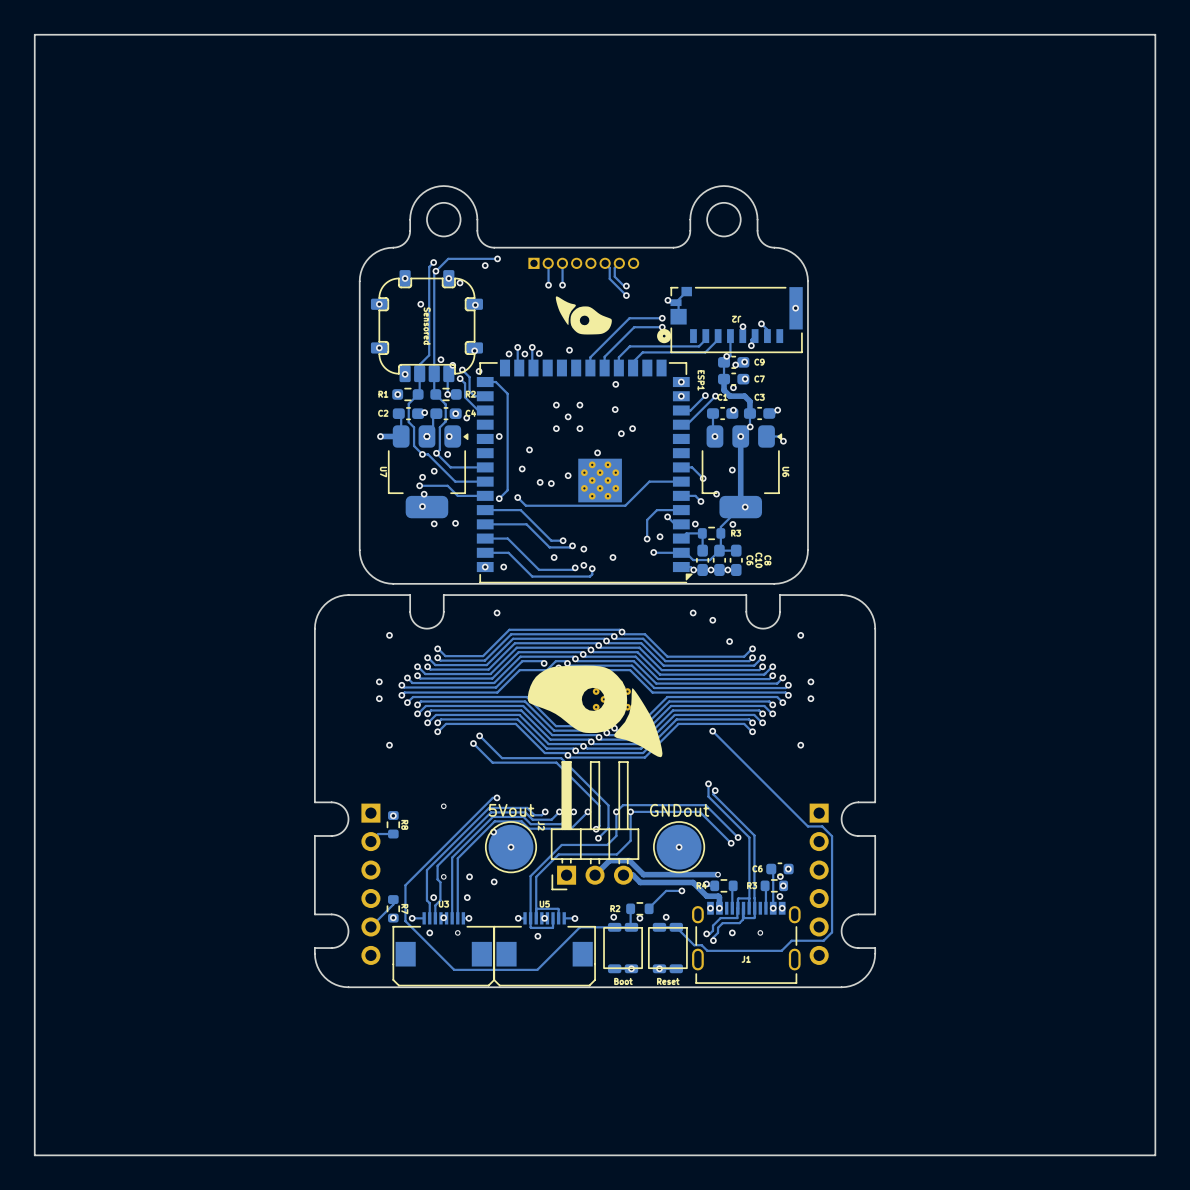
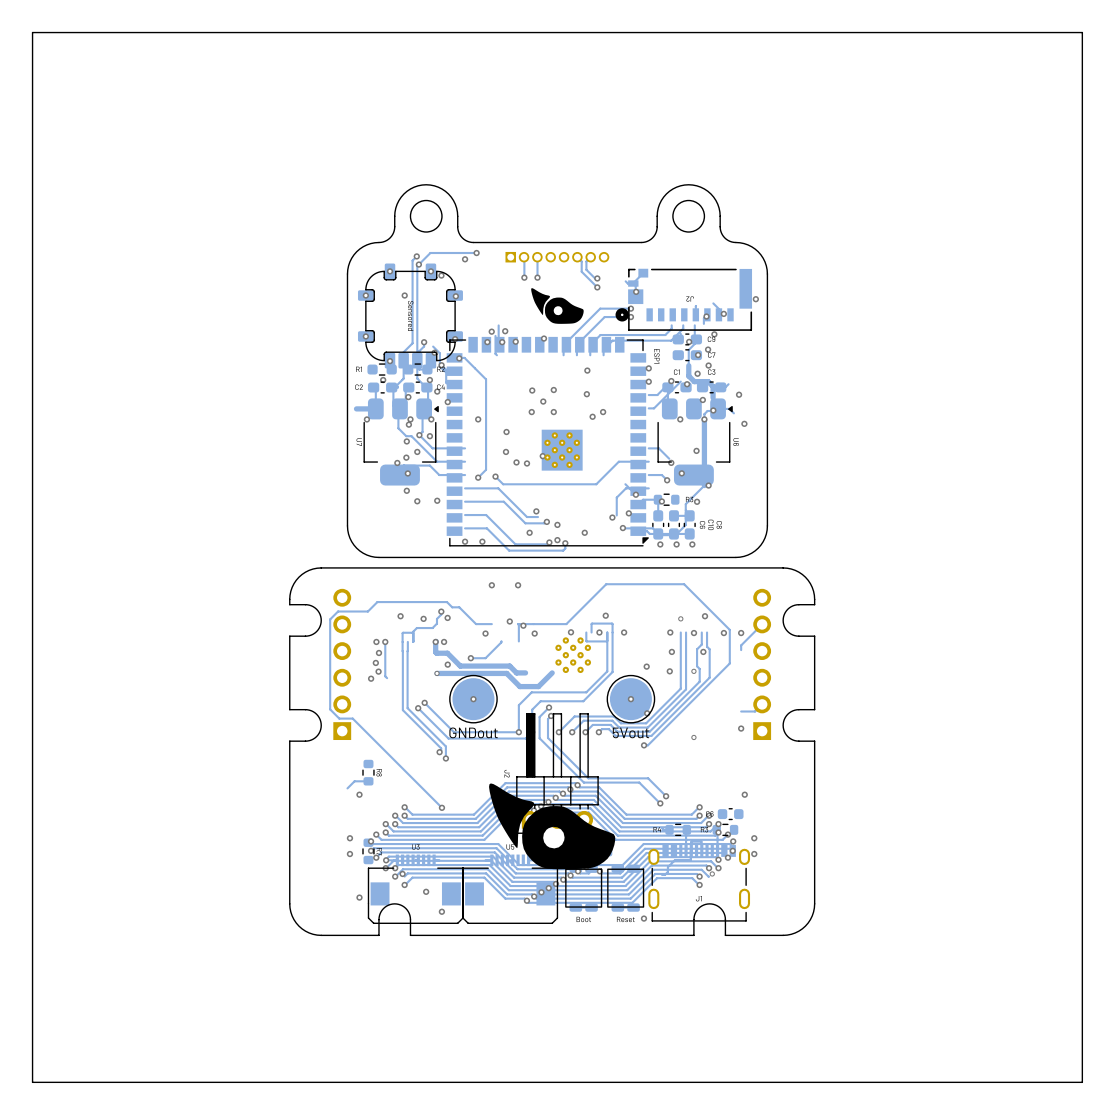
round board edge position: (443, 219) -> (426, 216)
round board edge position: (723, 219) -> (688, 216)
board edge: (757, 219) (757, 233) (761, 241) (767, 246) (783, 248) (794, 254) (803, 264) (807, 276) (807, 550) (805, 563) (798, 573) (787, 581) (774, 583) (393, 583) (380, 581) (369, 573) (362, 563) (359, 550) (360, 276) (364, 264) (372, 254) (384, 248) (399, 246) (406, 241) (410, 233) (411, 210) (419, 195) (430, 188) (443, 186) (452, 187) (464, 192) (472, 202) (476, 210) (479, 239) (483, 244) (492, 247) (677, 247) (685, 242) (689, 237) (691, 210) (697, 199) (707, 190) (719, 186) (732, 187) (747, 195) (754, 206) (757, 219) -> none
track: (497, 258) (448, 258) (434, 272) (434, 392) (445, 404) -> (476, 253) (430, 253) (417, 266) (417, 378)
via: (497, 258) -> none
track: (433, 262) (429, 266) (429, 355) (419, 364) (419, 392) (408, 403) (408, 422) (414, 427) (414, 446) (422, 454) (428, 454) (439, 465) -> (416, 256) (412, 260) (412, 343) (403, 352) (403, 378) (393, 388) (393, 405) (398, 410) (398, 428) (406, 436) (411, 436)
via: (433, 262) -> none
track: (548, 263) (548, 285) -> (524, 257) (524, 277)
track: (562, 263) (562, 285) -> (537, 257) (537, 277)
part position: (583, 263) -> (557, 257)
track: (605, 263) (609, 267) (609, 278) (620, 290) -> (577, 257) (581, 261) (581, 271)
track: (619, 263) (614, 267) (614, 276) (626, 286) -> (590, 257) (586, 261) (586, 269) (597, 278)
via: (485, 265) -> none
via: none -> (476, 253)
via: (435, 271) -> none
via: none -> (416, 256)
via: none -> (465, 259)
via: (405, 278) -> none
via: (448, 278) -> none
via: none -> (418, 264)
via: (460, 282) -> none
via: (548, 285) -> none
via: (562, 285) -> none
via: (626, 286) -> none
via: none -> (390, 271)
via: none -> (430, 271)
via: none -> (441, 275)
track: none -> (586, 276) (597, 287)
via: (626, 295) -> none
via: none -> (524, 277)
via: none -> (537, 277)
via: none -> (597, 278)
via: (667, 300) -> none
via position: (379, 304) -> (365, 295)
via: (420, 304) -> none
via: (475, 305) -> none
via: none -> (597, 287)
via position: (795, 308) -> (755, 299)
via: none -> (636, 291)
via: none -> (404, 295)
drawing position: (583, 315) -> (557, 306)
via: none -> (455, 296)
track: (662, 318) (629, 318) (590, 357) (590, 368) -> (630, 308) (600, 308) (563, 345) (563, 355)
via: (662, 318) -> none
via: (761, 323) -> none
part position: (426, 326) -> (410, 315)
via: (742, 326) -> none
track: (662, 327) (634, 327) (604, 356) (604, 368) -> (630, 317) (604, 317) (576, 344) (576, 355)
via: (662, 327) -> none
via: none -> (630, 308)
via: none -> (723, 313)
track: (705, 336) (705, 339) (699, 346) (629, 346) (618, 357) (618, 368) -> (671, 325) (671, 328) (665, 335) (600, 335) (590, 345) (590, 355)
track: (718, 336) (718, 339) (705, 352) (642, 352) (633, 362) (633, 368) -> (683, 325) (683, 328) (671, 340) (612, 340) (603, 349) (603, 355)
track: (730, 336) (730, 355) (724, 362) (724, 390) (729, 396) (744, 396) (749, 401) (749, 413) -> (694, 325) (694, 343) (688, 349) (688, 376) (694, 381) (708, 381) (713, 386) (713, 397)
via: none -> (706, 316)
via: none -> (630, 317)
via: (751, 345) -> none
via: (379, 347) -> none
track: (517, 347) (519, 368) -> (495, 335) (496, 355)
via: (517, 347) -> none
via: (532, 347) -> none
via: (474, 350) -> none
via: (569, 350) -> none
via: (509, 354) -> none
via: (726, 356) -> none
via: none -> (714, 334)
via: none -> (365, 336)
via: (440, 359) -> none
via: none -> (544, 338)
via: (744, 361) -> none
via: none -> (455, 339)
via: none -> (515, 341)
via: none -> (487, 342)
via: none -> (502, 342)
via: (462, 369) -> none
via: (479, 371) -> none
via: none -> (708, 349)
via: (405, 374) -> none
via: none -> (434, 352)
track: (460, 378) (465, 383) (465, 397) (476, 408) -> (441, 365) (446, 369) (446, 382)
via: (460, 378) -> none
via: none -> (459, 358)
via: (681, 382) -> none
via: (615, 384) -> none
via: none -> (390, 361)
via: (733, 387) -> none
via: none -> (441, 365)
via: none -> (708, 365)
track: (507, 393) (507, 490) (499, 498) -> (475, 368) (486, 379) (486, 469) (478, 477)
via: none -> (648, 368)
via: (397, 394) -> none
via: (447, 394) -> none
via: none -> (587, 370)
track: (705, 395) (690, 410) (681, 410) -> (671, 381) (657, 395) (648, 395)
via: (705, 395) -> none
via: (681, 396) -> none
track: (715, 396) (686, 424) (681, 424) -> (680, 381) (654, 408) (648, 408)
via: (715, 396) -> none
via: none -> (697, 373)
track: (445, 404) (445, 421) (439, 427) (439, 449) (436, 453) (447, 464) -> (417, 378) (428, 389) (428, 405) (422, 410) (422, 432) (419, 435)
via: none -> (383, 380)
via: none -> (429, 380)
via: (556, 405) -> none
via: (579, 405) -> none
via: none -> (671, 381)
via: none -> (648, 381)
via: (615, 409) -> none
via: (777, 410) -> none
via: (424, 412) -> none
via: (455, 413) -> none
track: (749, 413) (750, 426) (744, 427) (740, 430) (740, 507) -> (713, 397) (713, 410) (707, 411) (704, 414) (704, 485)
via: none -> (553, 390)
via: none -> (586, 394)
via: none -> (739, 394)
via: none -> (408, 397)
via position: (556, 428) -> (531, 412)
via: (632, 428) -> none
via: none -> (447, 402)
via: (621, 433) -> none
via: (380, 436) -> none
via: (426, 436) -> none
via: (449, 436) -> none
via: (499, 436) -> none
via: (714, 436) -> none
via: (740, 436) -> none
via: none -> (713, 410)
via: none -> (603, 412)
via: (783, 441) -> none
via: none -> (592, 416)
via: none -> (366, 419)
via: none -> (410, 419)
via: none -> (431, 419)
via: none -> (478, 419)
via: none -> (680, 419)
via: none -> (704, 419)
via: (529, 449) -> none
via position: (597, 452) -> (553, 412)
via: none -> (744, 423)
via: (422, 454) -> none
via: (447, 454) -> none
via: none -> (506, 432)
via: none -> (419, 435)
via: none -> (429, 436)
track: (485, 467) (450, 467) -> (465, 448) (432, 448) (422, 437)
track: (681, 467) (692, 467) (703, 478) -> (648, 448) (658, 448) (669, 458)
via: (522, 468) -> none
via: (732, 470) -> none
via: (568, 475) -> none
via: (422, 477) -> none
via: (703, 478) -> none
track: (485, 481) (455, 481) -> (465, 461) (437, 461) (426, 451)
track: (681, 481) (649, 481) (625, 505) (525, 505) (517, 497) -> (648, 461) (618, 461) (596, 484) (503, 484) (495, 476)
via: none -> (696, 450)
via: none -> (417, 451)
via: (551, 483) -> none
via: (419, 485) -> none
track: (420, 485) (447, 485) (457, 495) (485, 495) -> (404, 465) (429, 465) (439, 475) (465, 475)
via: none -> (542, 456)
via: none -> (406, 457)
via: none -> (516, 462)
via: none -> (527, 463)
track: (681, 495) (695, 495) (700, 501) -> (648, 475) (661, 475) (667, 480)
via: (517, 497) -> none
via: (499, 498) -> none
via: (700, 501) -> none
via: none -> (407, 473)
via: none -> (681, 473)
via: (422, 506) -> none
track: (740, 507) (720, 526) (720, 549) (710, 560) (693, 560) (685, 552) (653, 552) -> (704, 485) (685, 504) (685, 525) (675, 535) (659, 535) (653, 528) (622, 528)
via: (745, 507) -> none
via: none -> (495, 476)
via: none -> (478, 477)
track: (485, 510) (520, 510) (531, 521) -> (465, 488) (498, 488)
track: (681, 510) (657, 510) (647, 519) (647, 539) -> (648, 488) (626, 488) (616, 497) (616, 515)
via: none -> (667, 480)
via: (667, 516) -> none
via: none -> (708, 485)
via: (455, 523) -> none
track: (485, 524) (526, 524) (537, 535) -> (465, 501) (503, 501)
via: (695, 524) -> none
via: (732, 524) -> none
via: none -> (635, 494)
via: none -> (437, 500)
via: none -> (417, 501)
via: none -> (661, 501)
via: none -> (697, 501)
via: (660, 536) -> none
track: (485, 538) (507, 538) (518, 549) -> (465, 515) (486, 515)
via: (647, 539) -> none
track: (563, 540) (551, 540) -> (538, 517) (527, 517) (516, 506)
via: (563, 540) -> none
track: (572, 545) (549, 547) -> (546, 521) (525, 523) (514, 512)
via: none -> (628, 513)
via: (583, 549) -> none
track: (485, 552) (508, 552) (519, 564) -> (465, 528) (486, 528)
via: (554, 557) -> none
via: none -> (546, 521)
via: (612, 557) -> none
via: none -> (557, 524)
via: none -> (622, 528)
via: (583, 565) -> none
via: (485, 567) -> none
via: (503, 567) -> none
track: (575, 567) (573, 569) (539, 569) -> (549, 542) (547, 544) (515, 544) (504, 533)
via: (575, 567) -> none
via: none -> (529, 532)
track: (592, 568) (592, 574) (590, 576) (532, 576) -> (565, 543) (563, 550) (509, 550) (498, 540)
via: (592, 568) -> none
via: none -> (584, 532)
via: (693, 569) -> none
via: (711, 569) -> none
via: (727, 569) -> none
via: none -> (557, 540)
via: none -> (465, 541)
via: none -> (482, 541)
via: none -> (549, 542)
via: none -> (565, 543)
via: none -> (660, 544)
via: none -> (676, 544)
via: none -> (692, 544)
board edge: (443, 595) (443, 614) (441, 620) (435, 626) (426, 628) (418, 626) (412, 620) (410, 614) (410, 595) -> (415, 557) (384, 557)
board edge: (779, 595) (779, 614) (777, 620) (771, 626) (763, 628) (754, 626) (748, 620) (746, 614) (746, 595) -> (730, 557) (699, 557)
board edge: (785, 595) (850, 596) (865, 604) (872, 615) (874, 624) (875, 802) (856, 802) (849, 804) (843, 810) (841, 819) (843, 827) (849, 833) (856, 835) (875, 835) (875, 914) (856, 914) (849, 916) (843, 922) (841, 931) (843, 939) (849, 945) (856, 947) (875, 948) (874, 958) (872, 966) (865, 977) (854, 984) (845, 986) (348, 987) (335, 984) (324, 977) (316, 962) (314, 948) (333, 947) (340, 945) (347, 937) (348, 929) (345, 921) (338, 915) (314, 914) (314, 835) (333, 835) (340, 833) (346, 827) (348, 819) (346, 810) (340, 804) (333, 802) (314, 802) (316, 619) (324, 604) (339, 596) (404, 595) -> (735, 557) (744, 556) (755, 550) (763, 541) (767, 530) (767, 269) (763, 258) (755, 249) (744, 243) (729, 241) (723, 236) (720, 228) (719, 208) (710, 193) (700, 187) (688, 184) (672, 188) (663, 197) (658, 208) (655, 232) (649, 240) (641, 242) (471, 242) (463, 239) (459, 234) (455, 204) (448, 193) (441, 188) (430, 185) (418, 185) (410, 188) (401, 197) (395, 208) (394, 228) (391, 236) (385, 241) (370, 243) (359, 249) (351, 258) (347, 274) (347, 530) (349, 538) (356, 548) (366, 555) (378, 557)
board edge: none -> (783, 567) (321, 567) (309, 570) (302, 574) (292, 587) (289, 604) (313, 606) (320, 614) (321, 622) (317, 630) (311, 634) (289, 636) (289, 709) (313, 711) (319, 717) (321, 725) (319, 733) (313, 739) (289, 741) (289, 903) (292, 915) (296, 923) (305, 931) (317, 935) (378, 935) (381, 911) (386, 905) (394, 903) (402, 905) (408, 911) (410, 935) (693, 935) (696, 911) (701, 905) (709, 903) (717, 905) (723, 911) (725, 935) (787, 935) (802, 928) (810, 919) (814, 907) (814, 741) (791, 739) (785, 733) (783, 725) (785, 717) (791, 711) (814, 709) (814, 636) (791, 634) (785, 628) (783, 620) (785, 612) (791, 606) (814, 604) (814, 599) (812, 587) (805, 577) (795, 570) (783, 567)
via: (497, 612) -> none
via: (693, 612) -> none
via: (712, 620) -> none
via: none -> (491, 585)
via: none -> (518, 585)
via: (622, 632) -> none
via: (389, 635) -> none
via: (800, 635) -> none
via: (614, 636) -> none
via: (606, 640) -> none
via: (729, 641) -> none
via: (598, 645) -> none
via: (437, 648) -> none
track: (752, 648) (744, 656) (667, 656) (644, 634) (624, 634) (619, 629) (509, 629) (483, 656) (445, 656) (437, 648) -> none
via: (752, 648) -> none
via: (590, 649) -> none
track: none -> (441, 611) (441, 614) (436, 618) (436, 623) (432, 628) (416, 628) (413, 631) (413, 641) (412, 632) (402, 633) (402, 710) (441, 748) (439, 752)
via: none -> (441, 611)
via: (583, 654) -> none
via: (437, 657) -> none
via: none -> (605, 615)
track: (752, 657) (749, 661) (665, 661) (643, 638) (616, 638) (611, 634) (511, 634) (484, 660) (440, 660) (437, 657) -> none
track: (762, 657) (754, 665) (663, 665) (641, 643) (608, 643) (604, 638) (513, 638) (486, 665) (435, 665) (427, 657) -> none
via: (762, 657) -> none
via: (575, 658) -> none
via: none -> (447, 617)
via: none -> (423, 618)
via: none -> (680, 618)
track: (544, 663) (541, 661) (522, 661) (496, 687) (404, 687) (401, 685) -> none
via: (567, 663) -> none
drawing: [527, 665, 663, 758] -> none
via: (417, 666) -> none
via: (427, 666) -> none
track: none -> (491, 624) (476, 624) (459, 607) (452, 607) (446, 602) (377, 602) (367, 611) (338, 611) (330, 619) (330, 709) (339, 718) (352, 718) (441, 807)
track: (762, 666) (759, 670) (661, 670) (639, 647) (600, 647) (596, 643) (514, 643) (488, 669) (430, 669) (427, 666) -> none
via: (762, 666) -> none
track: (772, 666) (764, 674) (659, 674) (637, 652) (593, 652) (588, 647) (516, 647) (490, 674) (425, 674) (417, 666) -> none
via: (772, 666) -> none
track: none -> (762, 624) (741, 645) (741, 650)
track: (558, 667) (560, 670) (630, 670) (652, 692) (785, 692) (788, 695) -> none
via: none -> (571, 632)
via: (417, 675) -> none
track: none -> (586, 632) (586, 641) (607, 640)
via: none -> (599, 632)
track: none -> (607, 632) (607, 671) (586, 692) (531, 692) (518, 705) (518, 732) (454, 732) (424, 702)
via: none -> (624, 632)
via: none -> (670, 632)
track: none -> (680, 632) (680, 688) (646, 723) (620, 723) (614, 716) (574, 716) (558, 732)
track: none -> (686, 632) (686, 689) (647, 727) (619, 727) (612, 720) (583, 720) (572, 732)
via: none -> (693, 633)
track: none -> (701, 632) (701, 644) (697, 649) (699, 681) (649, 731) (617, 731) (610, 724) (592, 724) (585, 732)
track: none -> (707, 632) (707, 646) (709, 649) (709, 677) (651, 735) (615, 735) (608, 729) (601, 729) (598, 732)
track: (772, 675) (769, 679) (658, 679) (635, 656) (585, 656) (580, 652) (518, 652) (492, 678) (420, 678) (417, 675) -> none
via: none -> (741, 633)
via: none -> (485, 633)
via: none -> (534, 633)
via: (407, 677) -> none
track: (782, 677) (777, 683) (656, 683) (633, 661) (577, 661) (573, 656) (520, 656) (494, 683) (412, 683) (407, 677) -> none
via: (782, 677) -> none
via: (379, 681) -> none
via: (810, 681) -> none
track: none -> (436, 641) (435, 652) (447, 653) (460, 666) (509, 666) (516, 672) (525, 672)
track: none -> (501, 641) (485, 658) (470, 658)
track: none -> (518, 641) (518, 624) (566, 624) (606, 584) (684, 584) (729, 629) (729, 663) (647, 745) (644, 745)
track: none -> (385, 641) (385, 676) (387, 678)
via: none -> (385, 641)
track: none -> (407, 641) (407, 708) (445, 746) (445, 758)
via: none -> (435, 641)
via: none -> (444, 641)
track: (788, 685) (785, 688) (654, 688) (632, 665) (569, 665) (565, 661) (555, 661) (546, 670) (519, 670) (497, 692) (404, 692) (401, 695) -> none
via: (788, 685) -> none
via: (401, 695) -> none
via: none -> (671, 651)
via: none -> (703, 651)
via: (788, 695) -> none
via: none -> (378, 652)
via: (379, 698) -> none
via: (810, 698) -> none
via: (407, 702) -> none
via: none -> (470, 658)
track: (782, 702) (777, 697) (667, 697) (633, 730) (616, 730) (611, 726) (556, 726) (526, 697) (413, 697) (407, 702) -> none
via: (782, 702) -> none
via: (417, 704) -> none
track: (772, 704) (769, 701) (669, 701) (635, 735) (609, 735) (604, 730) (554, 730) (525, 701) (420, 701) (417, 704) -> none
via: (772, 704) -> none
via: none -> (375, 662)
via: none -> (447, 664)
via: none -> (646, 666)
via: (417, 713) -> none
via: (427, 713) -> none
track: (762, 713) (759, 710) (672, 710) (639, 744) (593, 744) (589, 739) (550, 739) (521, 710) (430, 710) (427, 713) -> none
via: (762, 713) -> none
track: (772, 713) (764, 705) (671, 705) (637, 739) (601, 739) (596, 735) (552, 735) (523, 705) (425, 705) (417, 713) -> none
via: (772, 713) -> none
via: none -> (378, 671)
via: none -> (693, 671)
via: none -> (437, 673)
track: none -> (552, 672) (538, 686) (519, 686) (506, 673) (437, 673)
track: (427, 722) (436, 714) (519, 714) (548, 744) (581, 744) (587, 748) -> (418, 708) (448, 738) (525, 738) (532, 732) (532, 709) (540, 701) (550, 701)
via: (427, 722) -> none
via: (437, 722) -> none
track: (752, 722) (749, 719) (676, 719) (643, 753) (577, 753) (573, 748) (546, 748) (517, 719) (441, 719) (437, 722) -> none
via: (752, 722) -> none
track: (762, 722) (754, 714) (674, 714) (641, 748) (622, 748) -> (591, 632) (592, 623) (612, 624) (612, 672) (583, 701)
via: (762, 722) -> none
via: none -> (371, 678)
via: (614, 728) -> none
via: (437, 731) -> none
track: (712, 731) (807, 826) (822, 826) (832, 836) (832, 932) (823, 940) (791, 940) (781, 950) (707, 950) (701, 945) (694, 945) (676, 927) (659, 927) -> none
via position: (712, 731) -> (669, 671)
track: (752, 731) (744, 723) (678, 723) (644, 757) (570, 757) (565, 753) (544, 753) (515, 723) (446, 723) (437, 731) -> none
via: (752, 731) -> none
via: (606, 732) -> none
track: (479, 735) (502, 758) (561, 758) (608, 805) (608, 828) (598, 838) -> none
via: (479, 735) -> none
via: (599, 737) -> none
via: (591, 741) -> none
track: (473, 743) (492, 762) (556, 762) (599, 805) (599, 825) (596, 829) -> none
via: (473, 743) -> none
via: (389, 745) -> none
via: (800, 745) -> none
via: none -> (473, 699)
via: (583, 746) -> none
via: none -> (630, 699)
via: none -> (424, 702)
via: (575, 750) -> none
track: none -> (762, 704) (755, 711) (741, 711)
via: none -> (418, 708)
via: (567, 755) -> none
track: none -> (549, 707) (539, 717) (539, 738) (583, 782) (639, 782) (660, 803)
via: none -> (549, 707)
via: none -> (647, 713)
track: none -> (551, 715) (548, 719) (548, 738) (588, 778) (648, 778) (666, 796)
via: none -> (551, 715)
via: none -> (741, 728)
via: none -> (518, 732)
via: none -> (558, 732)
via: none -> (572, 732)
via: none -> (585, 732)
via: none -> (598, 732)
track: (708, 783) (708, 796) (749, 837) (749, 908) -> none
via: (708, 783) -> none
via: none -> (693, 737)
track: (715, 790) (713, 794) (754, 835) (754, 917) (744, 918) (743, 908) (742, 919) (739, 923) (722, 923) (718, 927) (718, 932) (713, 937) (713, 940) -> none
via: (715, 790) -> none
via: none -> (644, 745)
track: (496, 797) (492, 797) (405, 885) (405, 921) (454, 969) (537, 969) (579, 927) (631, 927) (630, 908) -> none
via: (496, 797) -> none
via: none -> (439, 752)
via: (443, 806) -> none
via: none -> (445, 758)
part value position: 5Vout (511, 810) -> 5Vout (631, 732)
part value position: GNDout (679, 810) -> GNDout (473, 732)
track: (545, 811) (541, 815) (534, 815) (527, 807) (489, 807) (426, 870) (426, 900) (429, 903) (429, 918) -> none
via: (545, 811) -> none
track: (559, 811) (551, 819) (532, 819) (525, 812) (491, 812) (437, 865) (440, 900) (435, 905) (435, 918) -> none
via: (559, 811) -> none
track: (573, 811) (561, 824) (530, 824) (523, 816) (492, 816) (452, 857) (452, 918) -> none
via: (573, 811) -> none
track: (587, 811) (571, 828) (528, 828) (521, 821) (494, 821) (457, 858) (457, 918) -> none
via: (587, 811) -> none
via: (616, 811) -> none
via: (630, 811) -> none
via: (393, 815) -> none
via: (596, 829) -> none
via: (493, 832) -> none
drawing: none -> [489, 783, 616, 870]
track: (738, 837) (705, 805) (623, 805) (616, 811) (616, 835) (607, 844) (597, 844) -> (709, 815) (701, 823) (622, 823) (595, 795) (565, 795) (559, 791)
via: (738, 837) -> none
via: (598, 838) -> none
via: none -> (577, 785)
via: none -> (570, 789)
track: (731, 843) (699, 811) (630, 811) (630, 840) (616, 854) (558, 854) (536, 876) (536, 918) -> none
via: (731, 843) -> none
track: (561, 844) (530, 876) (530, 927) (552, 927) (553, 918) -> (526, 791) (508, 791) (477, 823) (403, 823) (395, 815)
part position: (511, 847) -> (630, 699)
via: (511, 847) -> none
via: none -> (562, 793)
part position: (679, 847) -> (473, 699)
via: (679, 847) -> none
via: none -> (359, 794)
via: none -> (744, 794)
via: none -> (666, 796)
via: none -> (555, 797)
via: none -> (548, 802)
via: none -> (660, 803)
via: none -> (541, 806)
via: none -> (404, 807)
track: none -> (699, 807) (691, 814) (626, 814) (599, 787) (579, 787) (575, 783) (505, 783) (473, 814) (412, 814) (404, 807)
via: none -> (699, 807)
via: none -> (533, 810)
track: (771, 869) (773, 871) (773, 908) -> none
via: (788, 869) -> none
via: none -> (395, 815)
via: none -> (404, 815)
track: none -> (699, 815) (696, 818) (624, 818) (597, 791) (572, 791) (568, 787) (507, 787) (475, 818) (407, 818) (404, 815)
via: none -> (699, 815)
via: none -> (709, 815)
track: (718, 874) (643, 874) (629, 860) (609, 860) (595, 875) -> none
via: (718, 874) -> none
track: (623, 875) (633, 875) (640, 882) (693, 882) (706, 896) (719, 897) (718, 908) -> none
via: (443, 876) -> none
via position: (469, 876) -> (441, 807)
via: (780, 876) -> none
via: none -> (385, 824)
via: none -> (395, 824)
track: none -> (709, 824) (705, 827) (621, 827) (593, 799) (557, 799) (553, 795) (510, 795) (479, 827) (398, 827) (395, 824)
via: none -> (709, 824)
track: none -> (718, 824) (710, 831) (619, 831) (592, 804) (550, 804) (546, 799) (512, 799) (480, 831) (393, 831) (385, 824)
via: none -> (718, 824)
via: (494, 881) -> none
part rotation: 0° (370, 884) -> 180° (342, 664)
part position: (370, 884) -> (342, 664)
via: (706, 884) -> none
part rotation: 0° (819, 884) -> 180° (762, 664)
part position: (819, 884) -> (762, 664)
via: (783, 885) -> none
via: none -> (385, 832)
track: none -> (718, 832) (715, 835) (617, 835) (590, 808) (543, 808) (539, 804) (514, 804) (482, 835) (388, 835) (385, 832)
via: none -> (718, 832)
via: none -> (376, 834)
track: (681, 890) (666, 890) (649, 908) -> none
via: (681, 890) -> none
track: none -> (727, 834) (722, 839) (616, 839) (588, 812) (536, 812) (531, 808) (515, 808) (484, 839) (381, 839) (376, 834)
via: none -> (727, 834)
via: none -> (349, 838)
via: none -> (754, 838)
via: (779, 896) -> none
via: (433, 897) -> none
via: (467, 897) -> none
track: none -> (371, 841) (373, 844) (498, 844) (519, 865) (584, 865) (586, 867)
via: none -> (371, 841)
track: none -> (733, 841) (730, 844) (643, 844) (622, 865) (597, 865) (588, 873) (580, 873) (575, 869) (517, 869) (496, 848) (373, 848) (371, 850)
via: none -> (733, 841)
track: (393, 899) (393, 904) (370, 926) -> none
via: none -> (371, 850)
via: (710, 908) -> none
via: (719, 908) -> none
via: (773, 908) -> none
track: none -> (733, 850) (731, 848) (644, 848) (620, 873) (601, 873) (599, 871)
track: (536, 909) (558, 908) (558, 918) -> none
via: none -> (349, 854)
via: none -> (754, 854)
via: none -> (376, 857)
track: none -> (727, 857) (723, 852) (646, 852) (621, 877) (572, 877) (568, 873) (515, 873) (494, 852) (381, 852) (376, 857)
via: none -> (727, 857)
via: (393, 917) -> none
via: (443, 917) -> none
via: (613, 917) -> none
via: (666, 917) -> none
track: none -> (718, 859) (715, 857) (648, 857) (623, 881) (565, 881) (561, 877) (514, 877) (493, 856) (388, 856) (385, 859)
via: none -> (718, 859)
via: (468, 918) -> none
via: (518, 918) -> none
via: (544, 918) -> none
via: (574, 918) -> none
via: (639, 918) -> none
via: none -> (385, 868)
via: none -> (395, 868)
track: none -> (709, 868) (706, 865) (651, 865) (627, 890) (550, 890) (546, 886) (510, 886) (489, 865) (398, 865) (395, 868)
via: none -> (709, 868)
track: none -> (718, 868) (711, 861) (650, 861) (625, 886) (558, 886) (553, 881) (512, 881) (491, 860) (393, 860) (385, 868)
via: none -> (718, 868)
via: none -> (578, 871)
via: none -> (599, 871)
via: (457, 932) -> none
via: (732, 932) -> none
via: (706, 933) -> none
via: none -> (570, 875)
via: none -> (395, 876)
track: none -> (699, 876) (696, 873) (655, 873) (630, 898) (536, 898) (532, 894) (507, 894) (486, 873) (407, 873) (404, 876)
via: none -> (699, 876)
track: none -> (709, 876) (701, 869) (653, 869) (628, 894) (543, 894) (539, 890) (508, 890) (487, 869) (403, 869) (395, 876)
via: (537, 936) -> none
via: none -> (563, 879)
via: (713, 940) -> none
via: none -> (556, 883)
via: none -> (404, 884)
track: none -> (699, 884) (692, 878) (657, 878) (632, 902) (529, 902) (524, 898) (505, 898) (484, 877) (412, 877) (404, 884)
via: none -> (699, 884)
via: none -> (548, 888)
via: none -> (426, 891)
via: none -> (541, 892)
via: none -> (534, 896)
via: none -> (359, 897)
via: none -> (526, 900)
via: (631, 968) -> none
via: (659, 968) -> none
via: none -> (441, 911)
via: none -> (643, 918)

